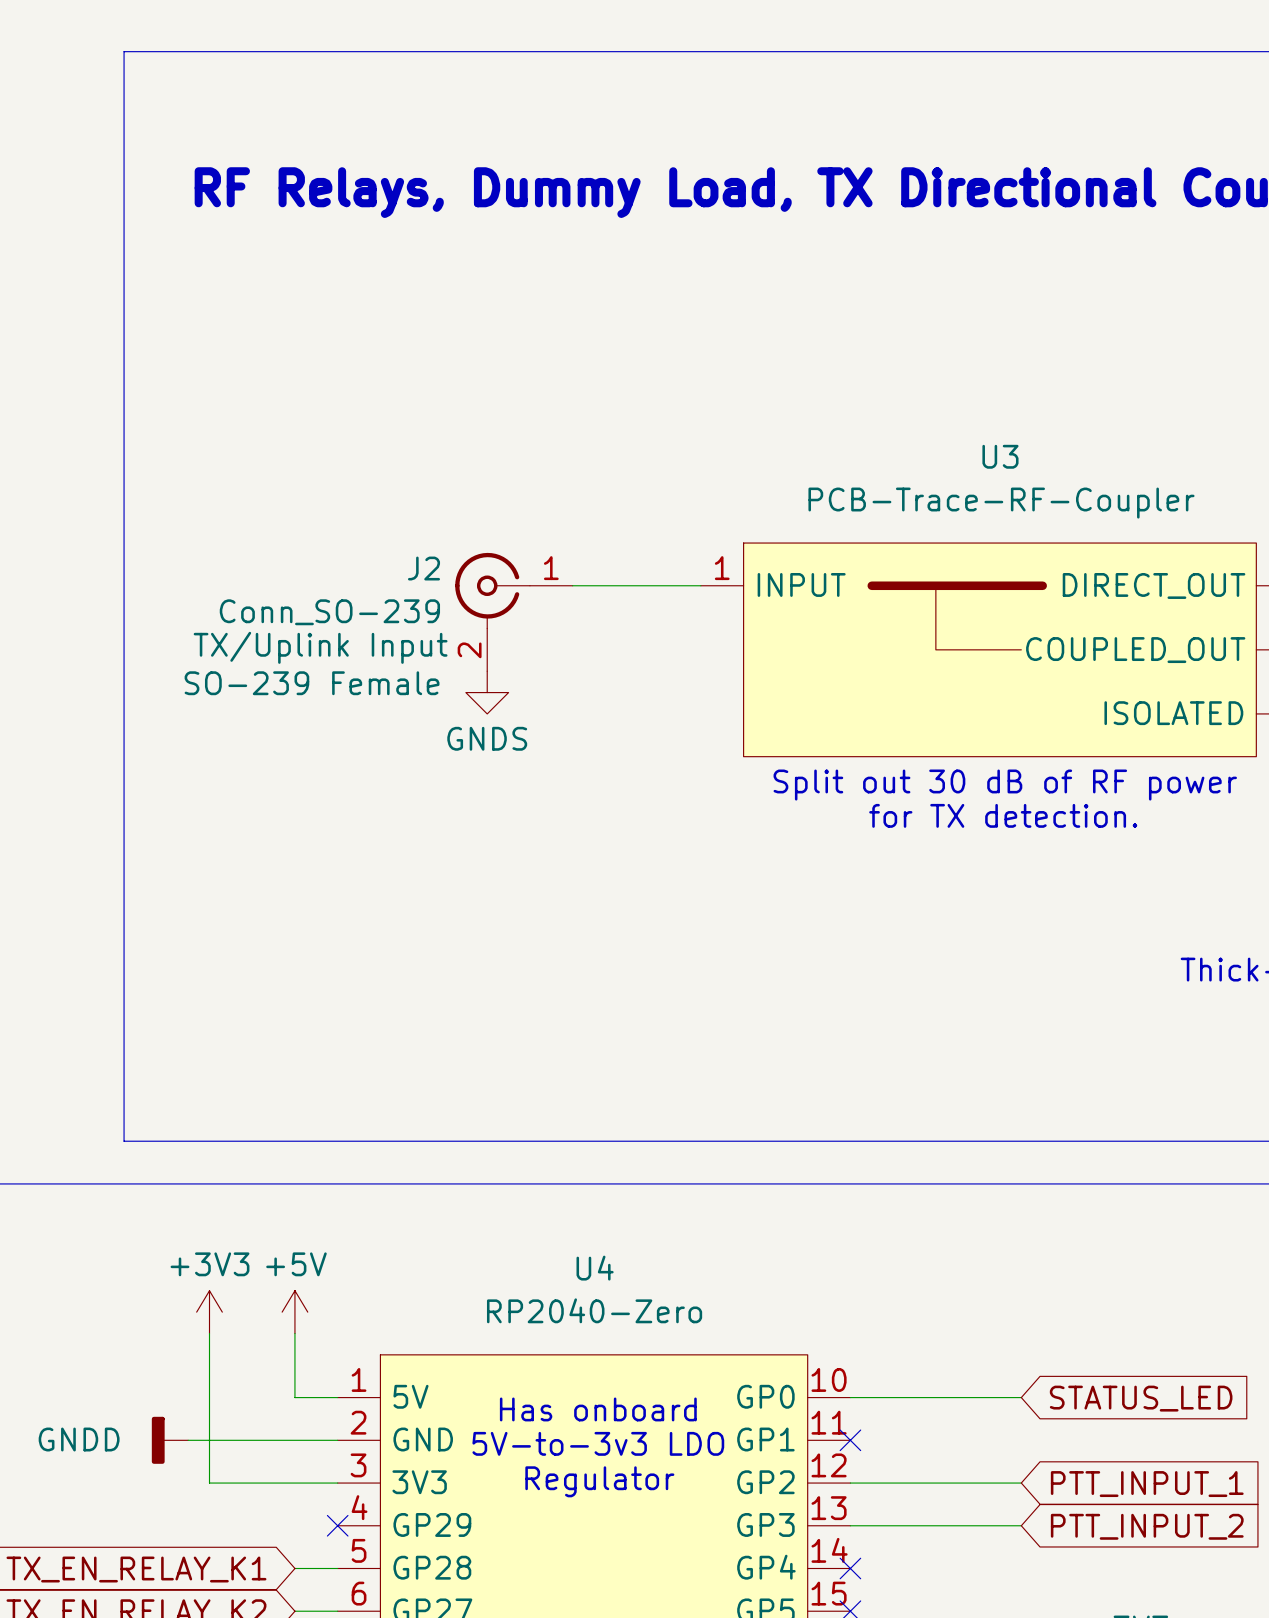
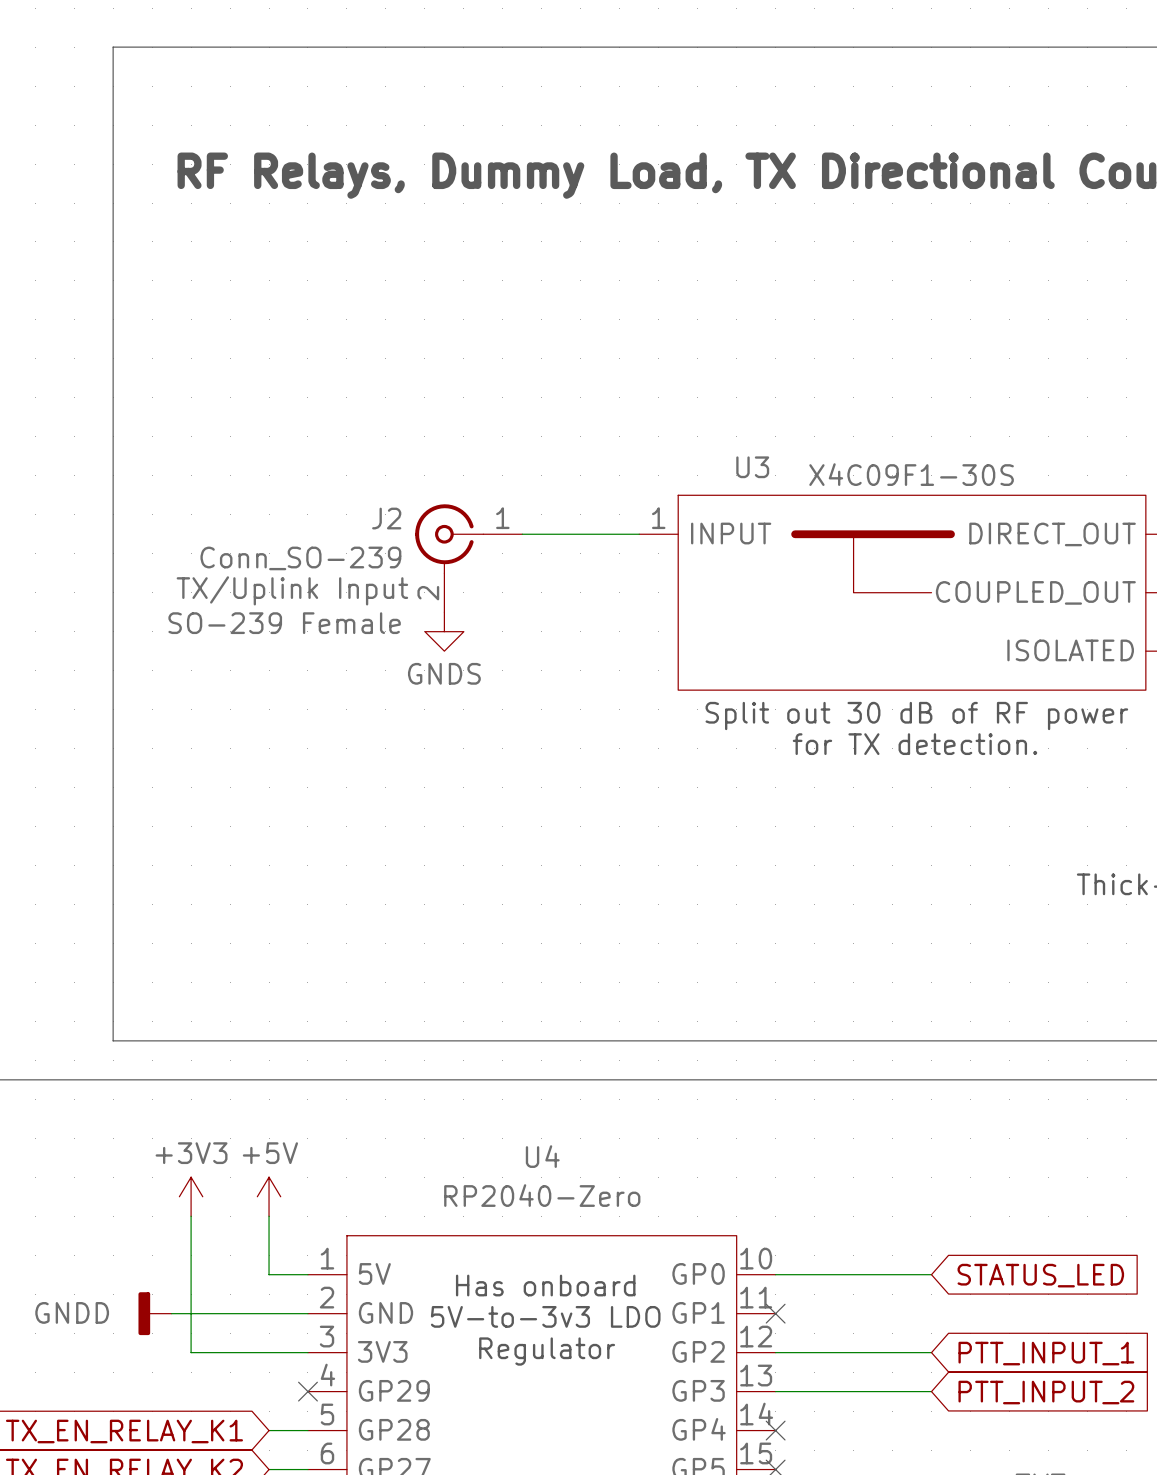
U3 name position: U3 (1000, 456) -> U3 (752, 467)
U3 value: PCB-Trace-RF-Coupler (1001, 503) -> X4C09F1-30S (911, 474)

